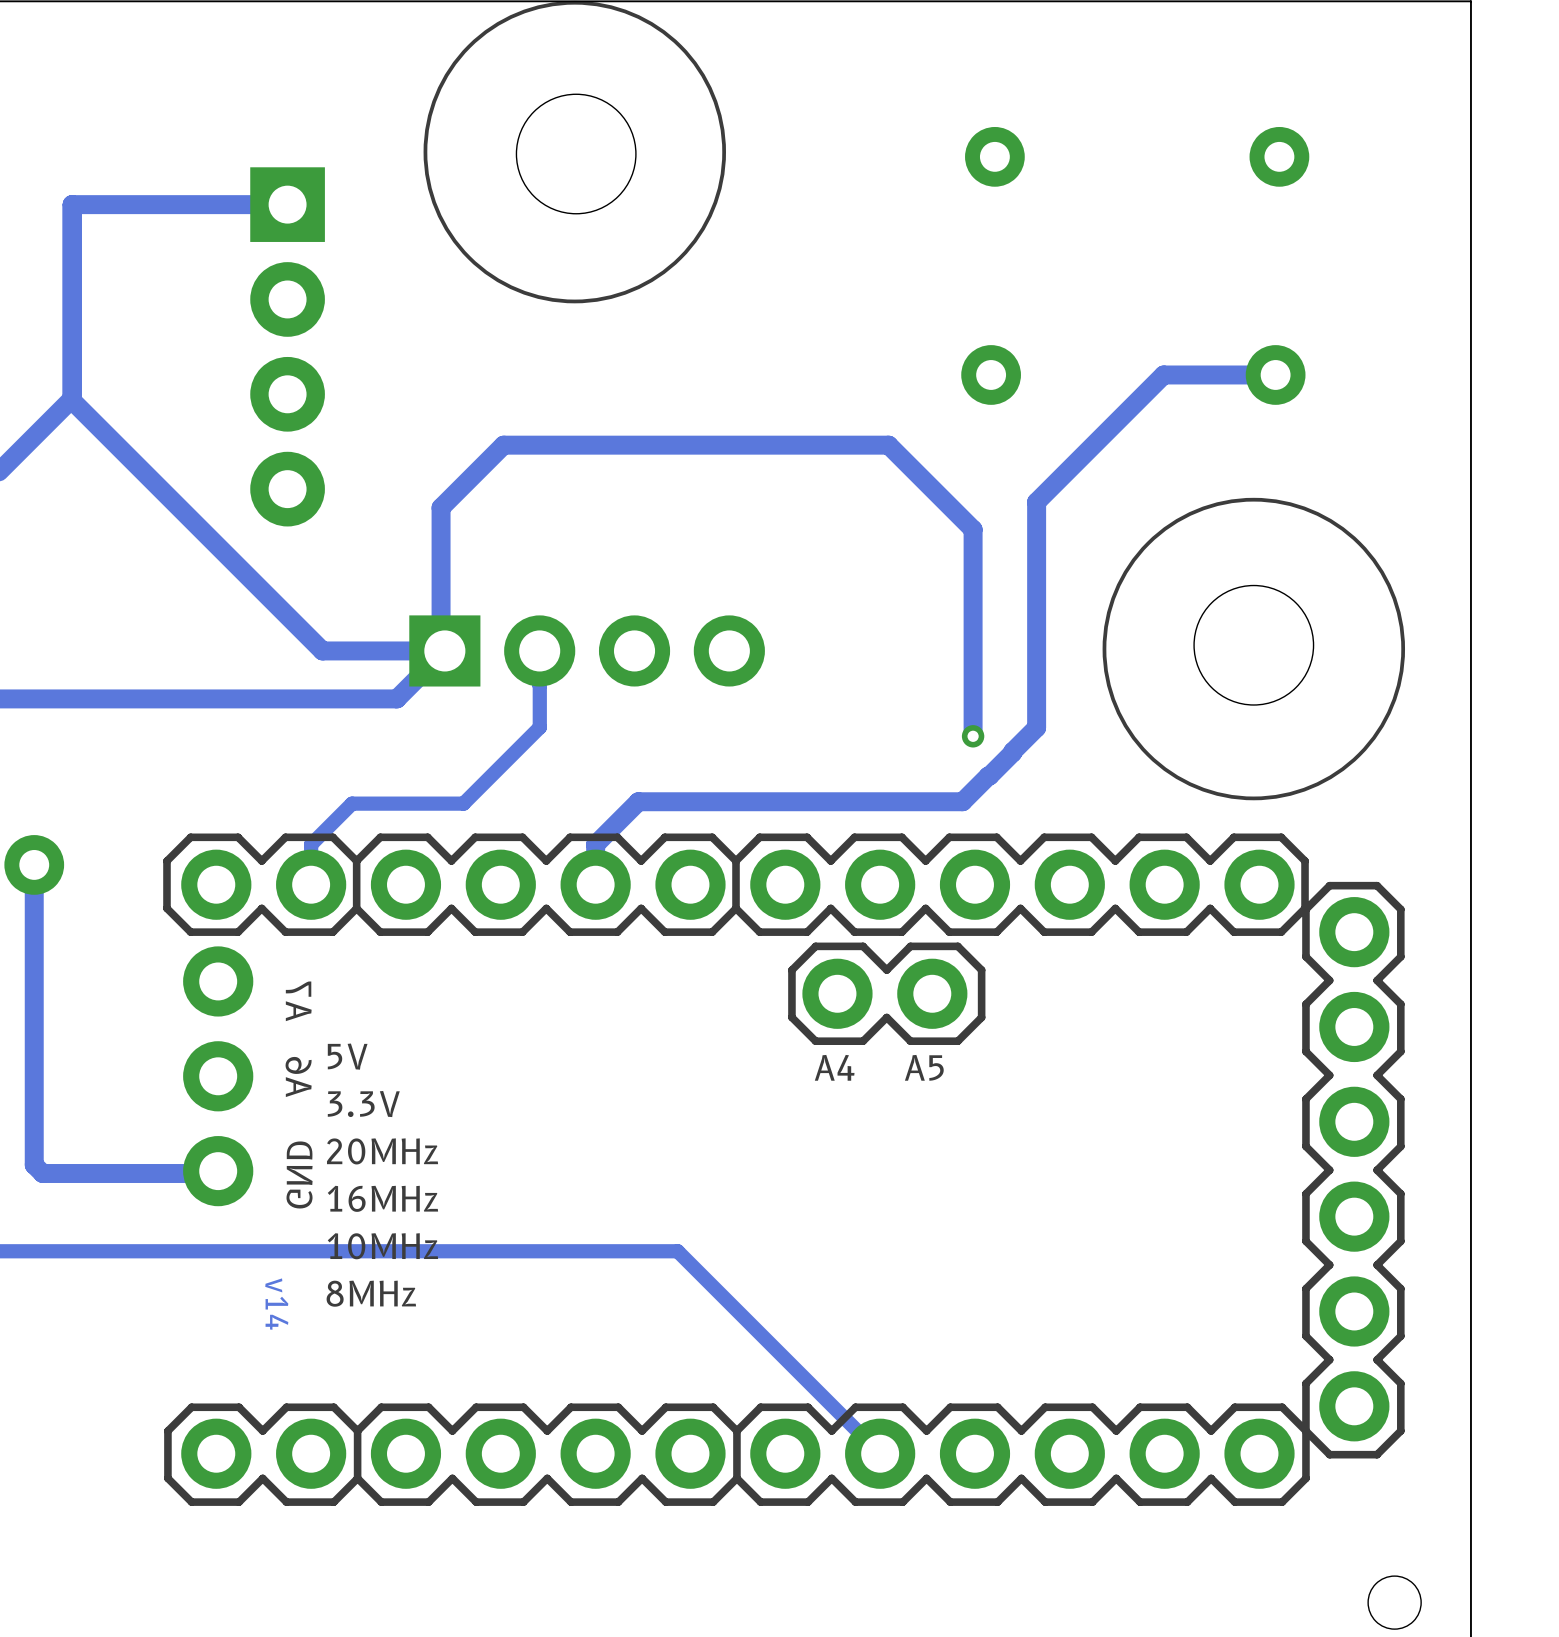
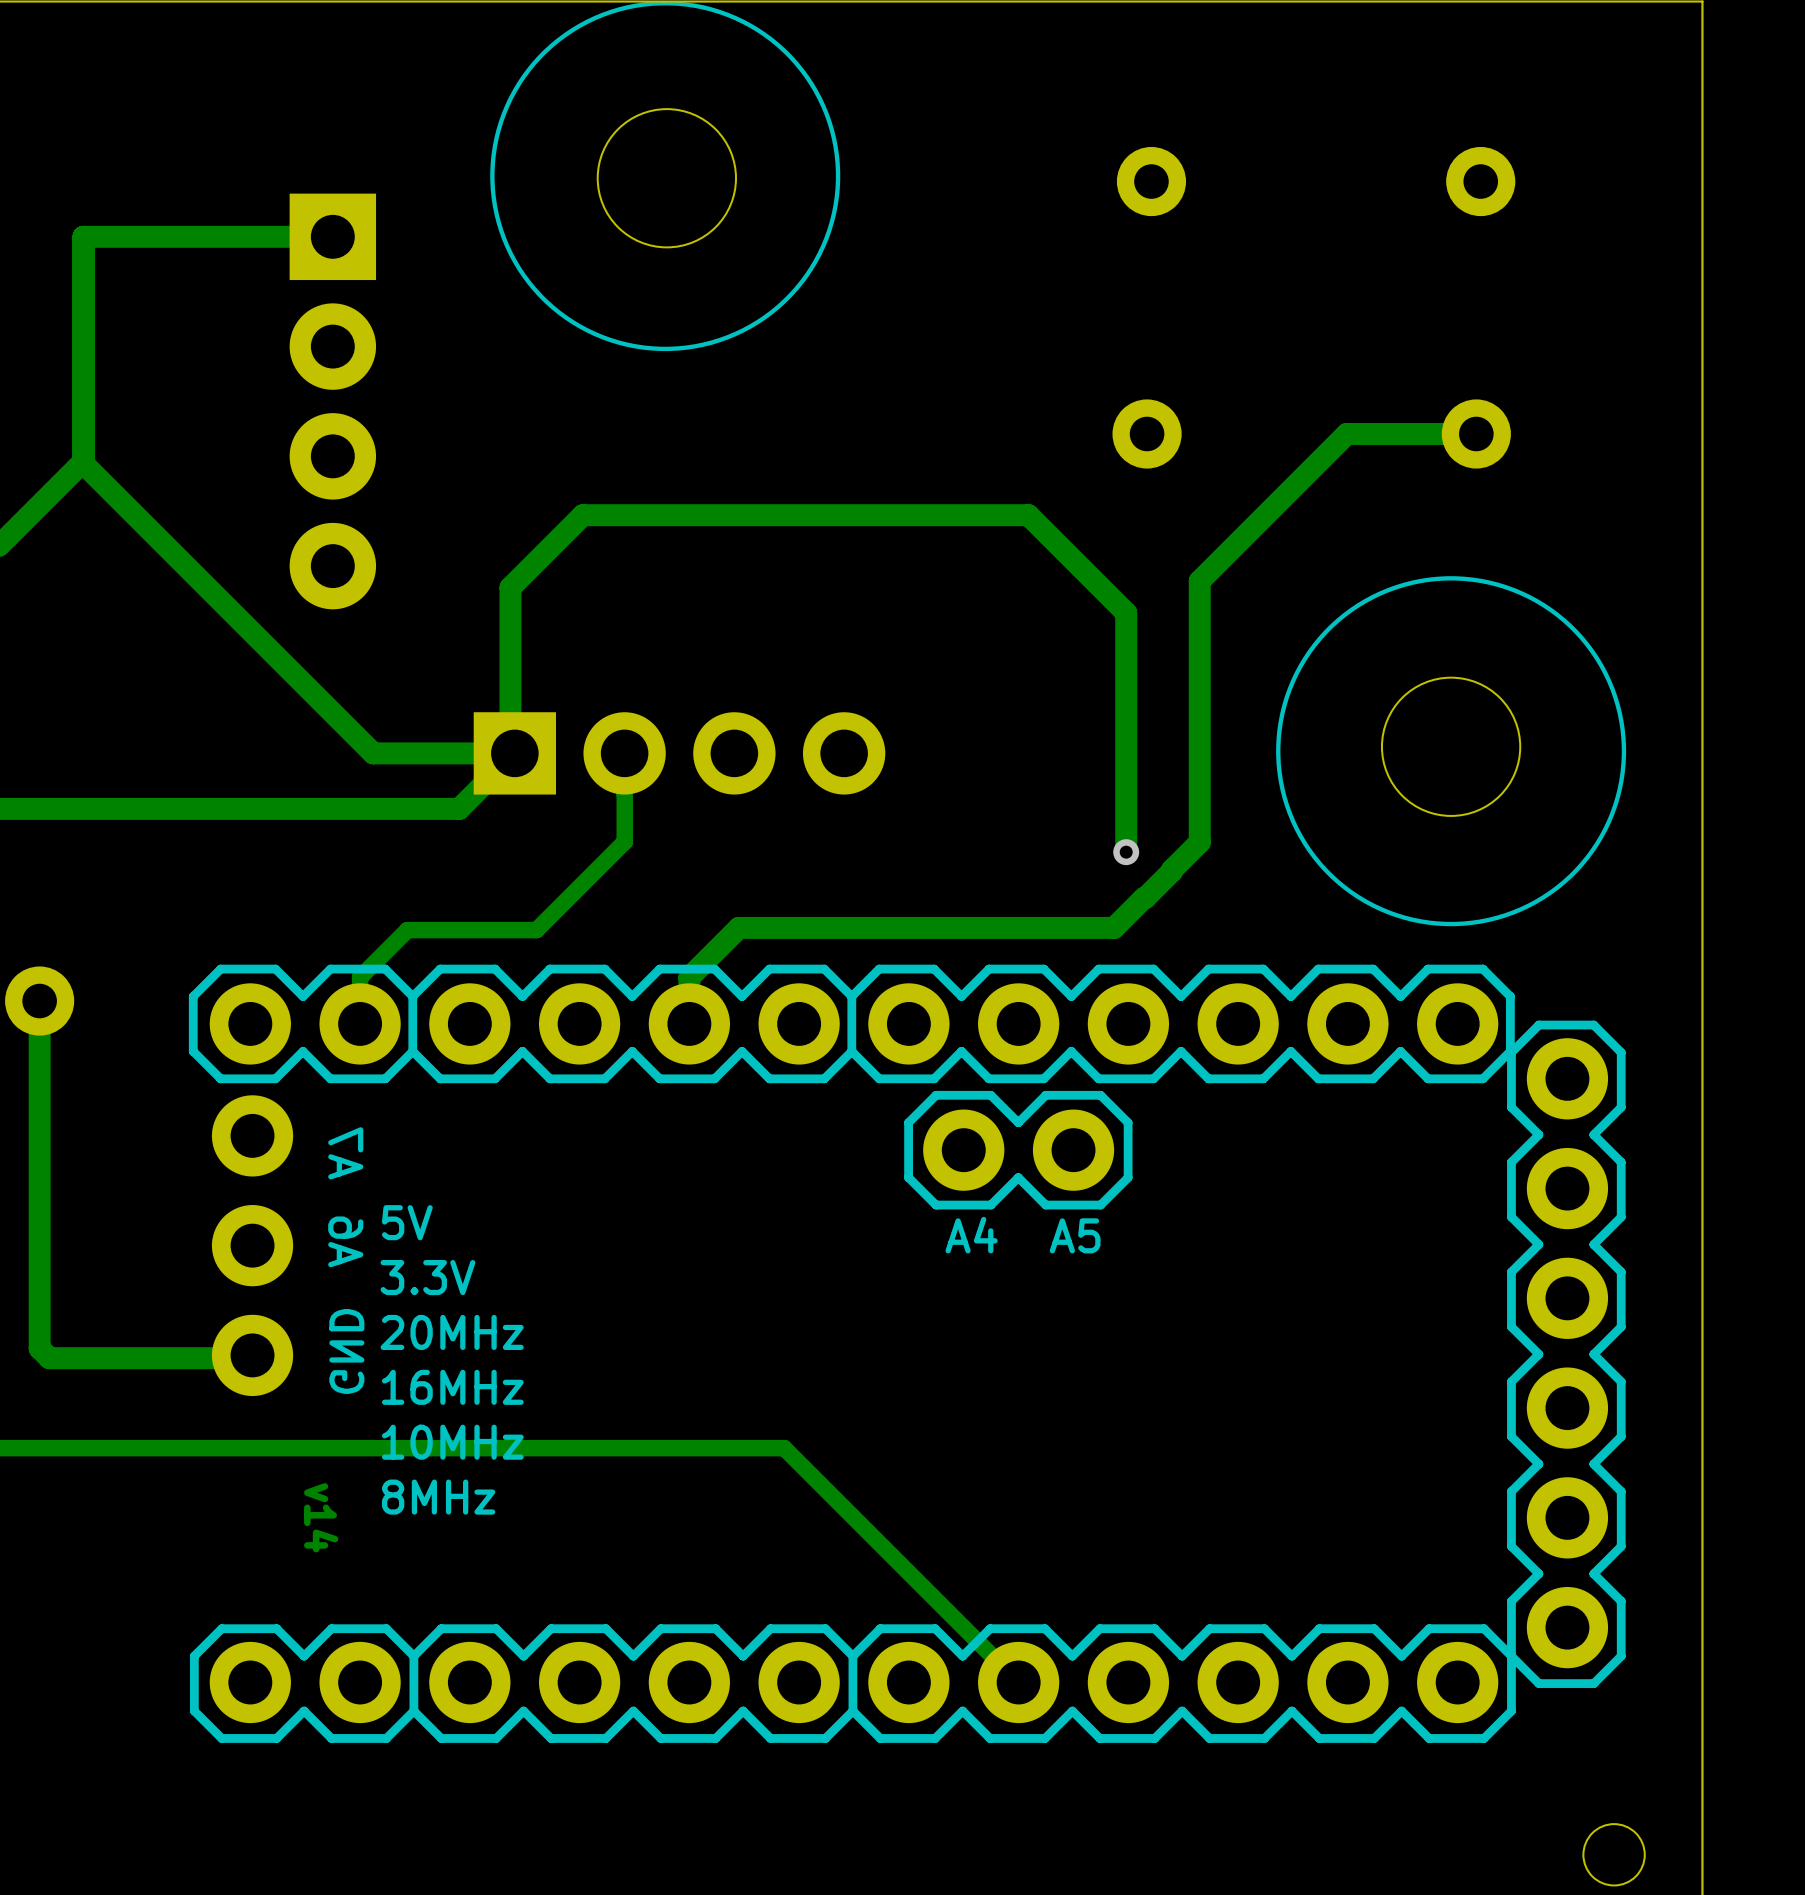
part footprint: [163, 833, 1405, 1506] -> [188, 964, 1626, 1743]

